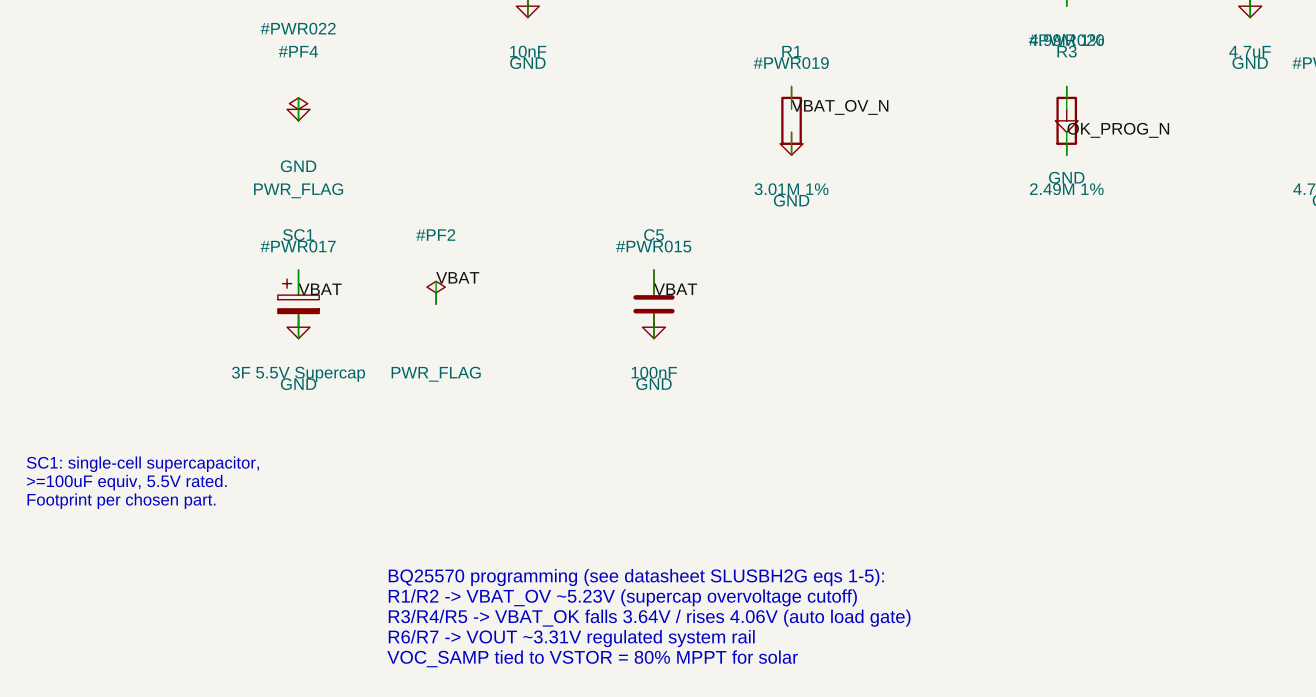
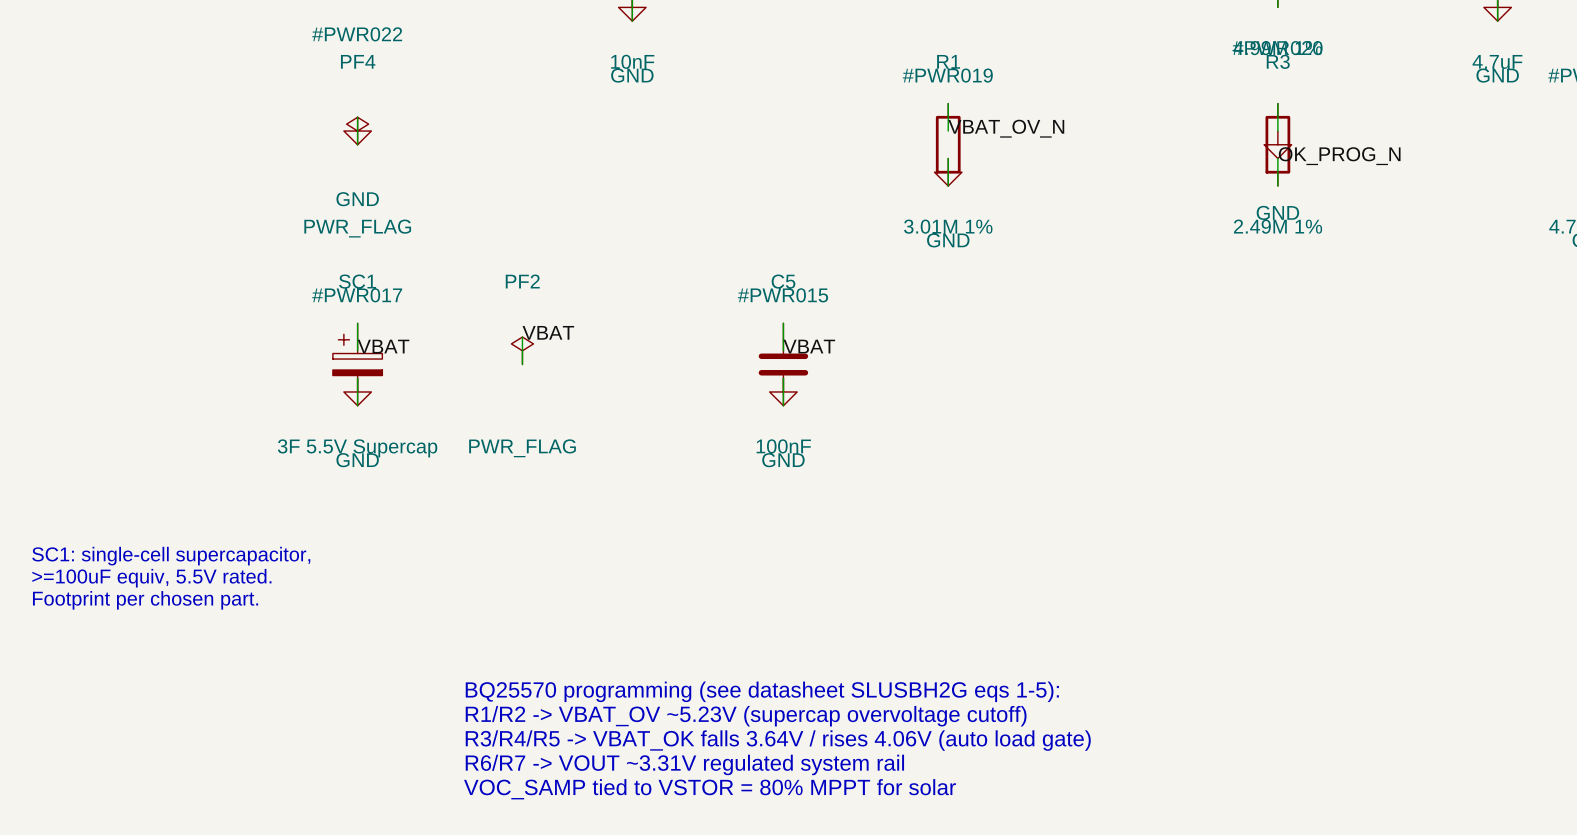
#PF4 name: #PF4 (298, 51) -> PF4 (358, 61)
#PF2 name: #PF2 (435, 234) -> PF2 (522, 281)

